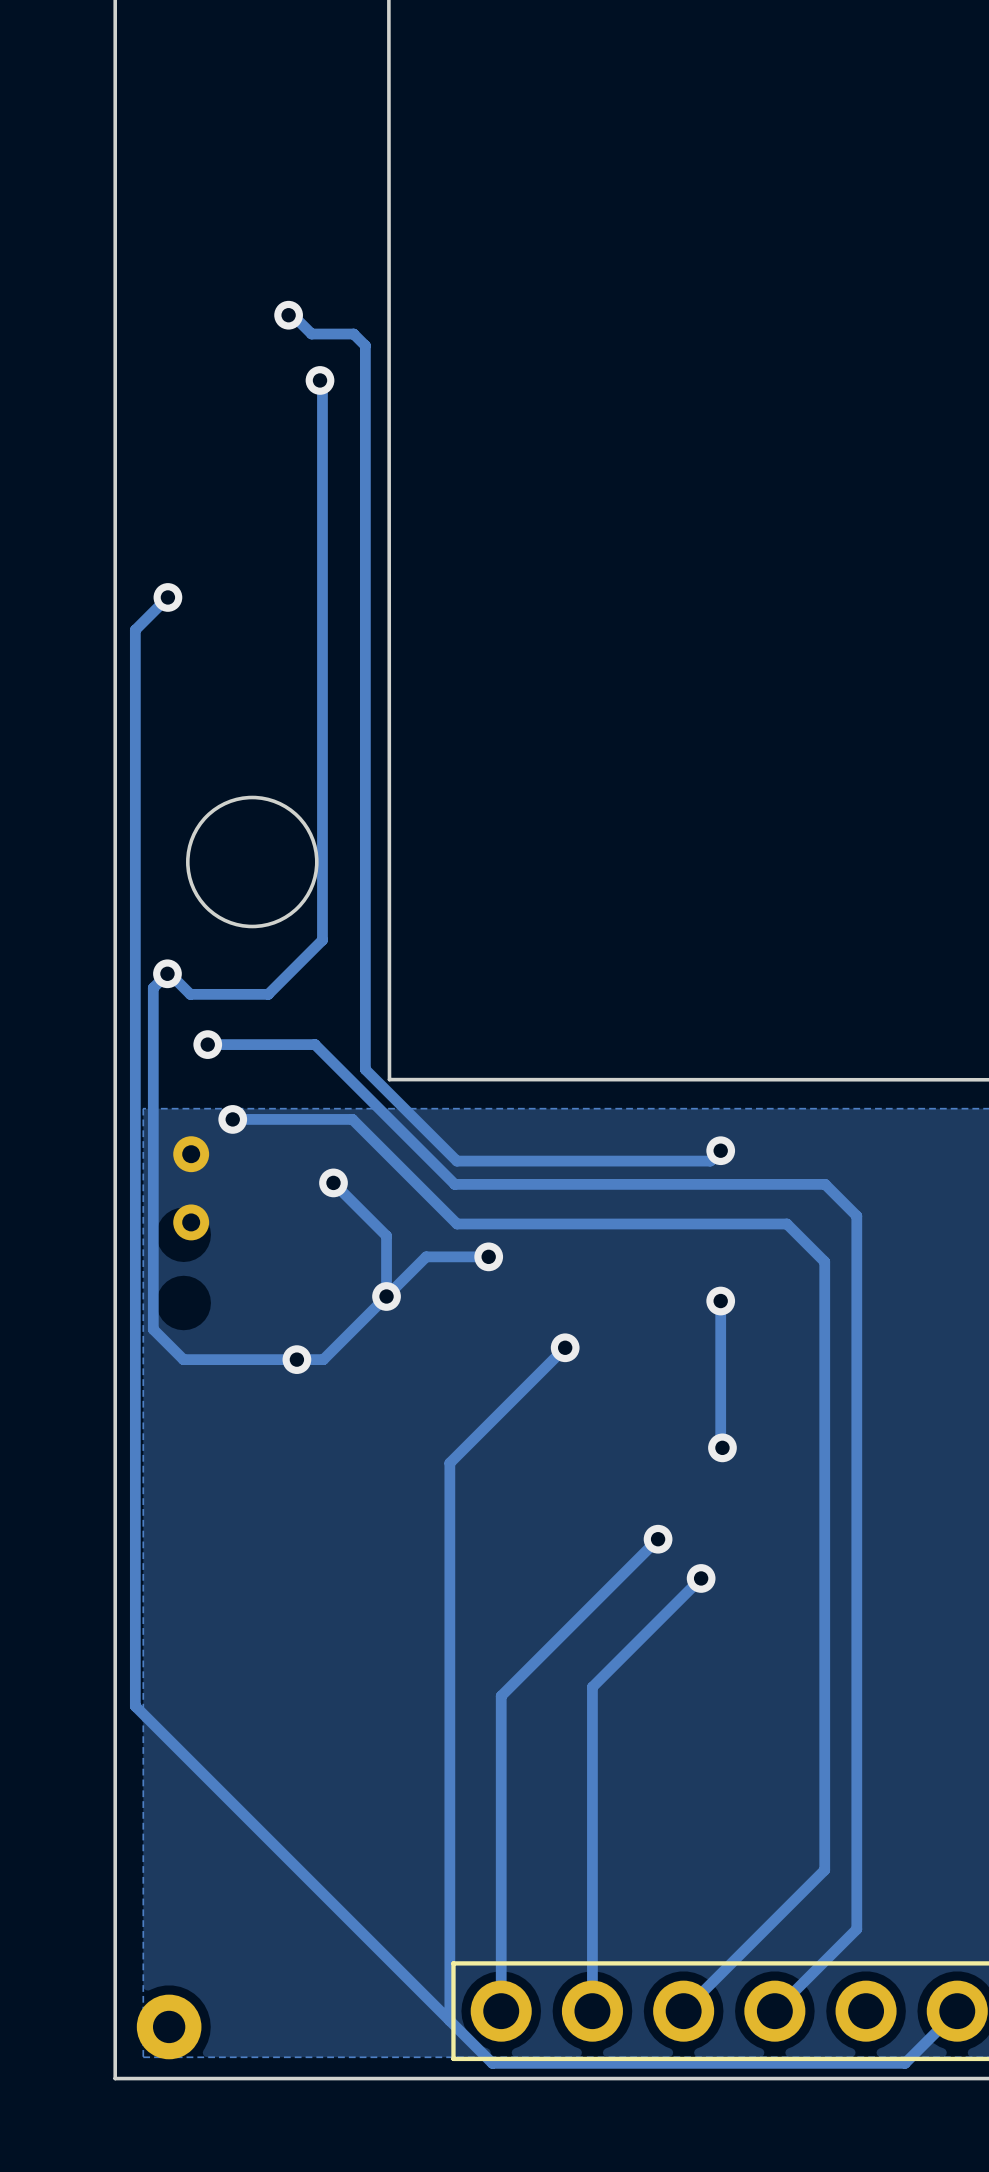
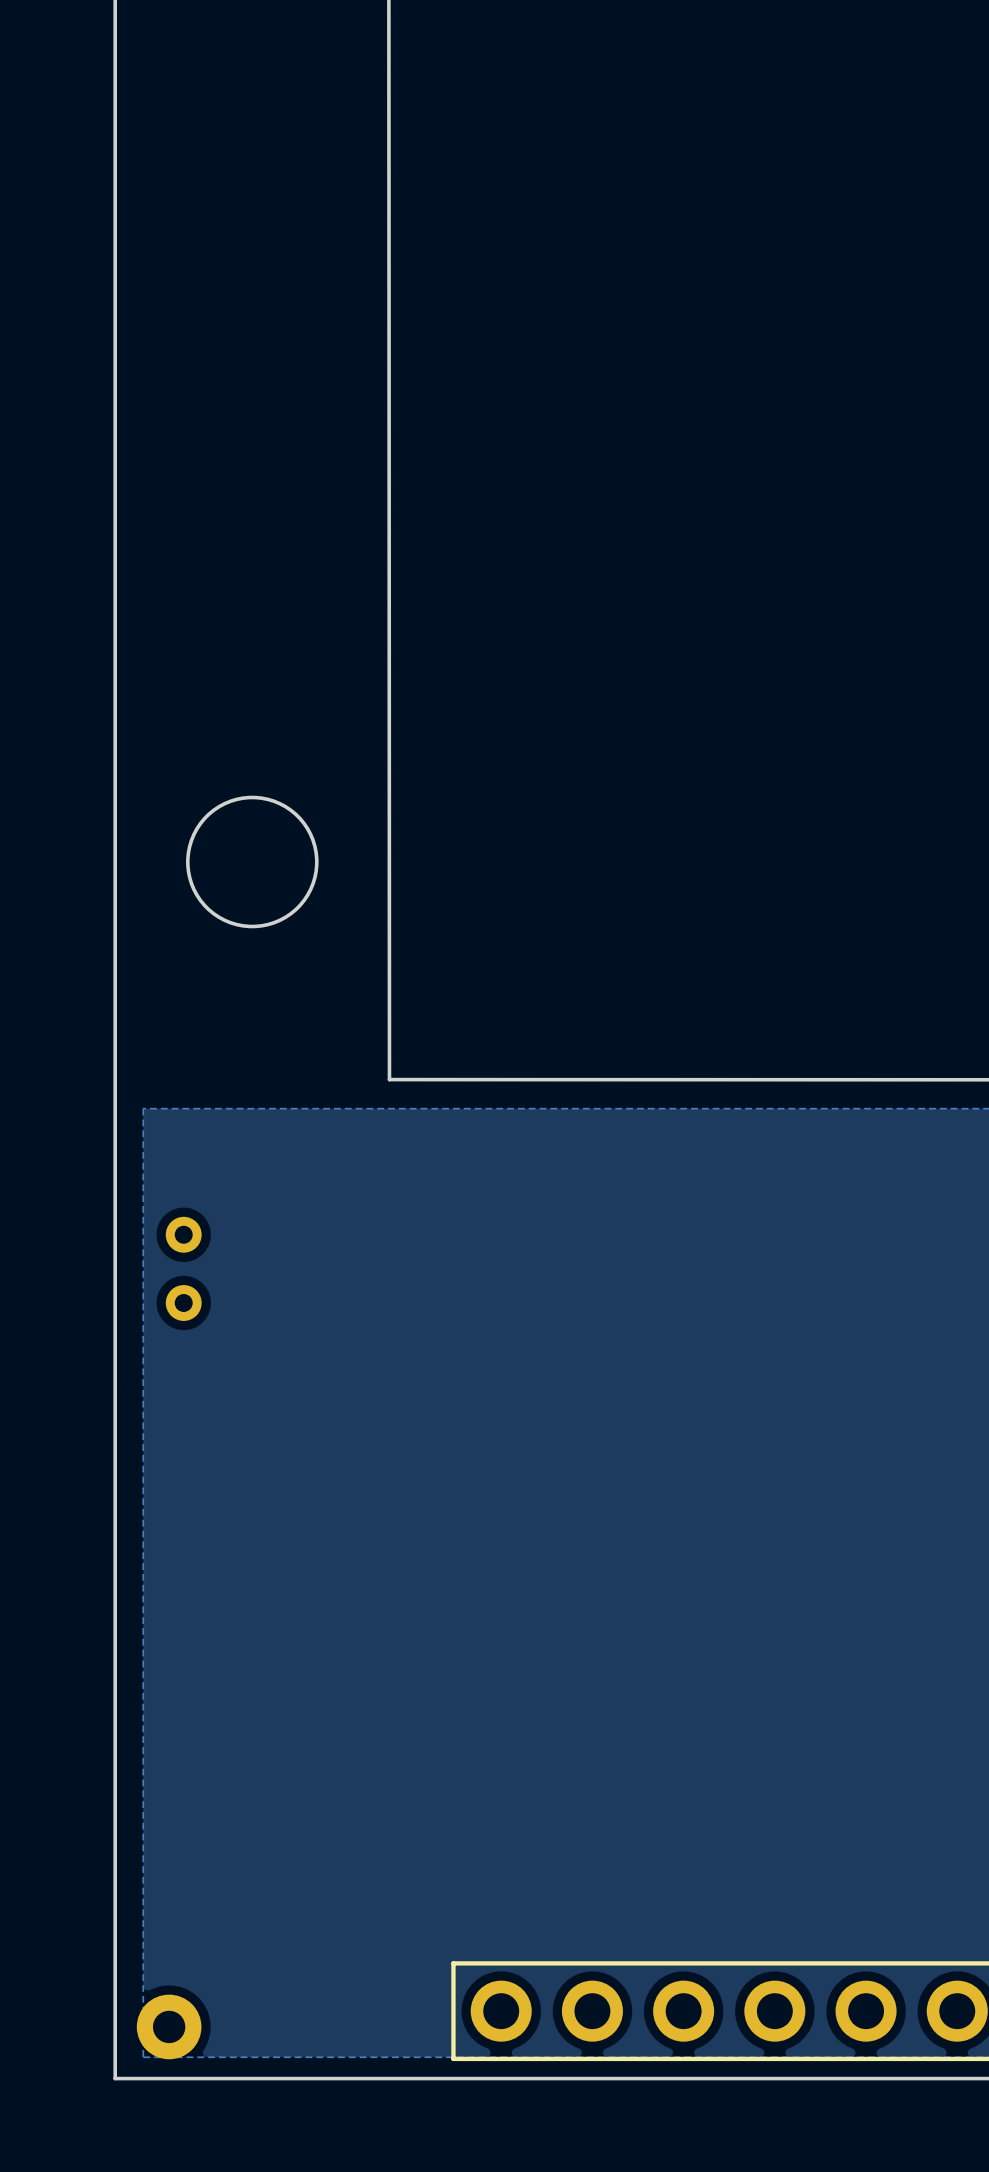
track: (288, 315) (292, 315) (311, 334) (353, 334) (365, 345) (365, 1069) (456, 1161) (710, 1161) (720, 1150) -> none
via: (288, 315) -> none
track: (320, 380) (322, 382) (322, 940) (268, 994) (190, 994) (169, 973) (167, 973) (153, 987) (153, 1329) (183, 1359) (323, 1359) (426, 1256) (488, 1256) -> none
via: (320, 380) -> none
track: (167, 597) (135, 630) (135, 1706) (492, 2063) (905, 2063) (957, 2011) -> none
via: (167, 597) -> none
via: (167, 973) -> none
track: (207, 1044) (315, 1044) (454, 1184) (825, 1184) (856, 1216) (856, 1929) (774, 2011) -> none
via: (207, 1044) -> none
track: (232, 1119) (352, 1119) (457, 1224) (786, 1224) (824, 1261) (824, 1870) (683, 2011) -> none
via: (232, 1119) -> none
via: (720, 1150) -> none
track: (333, 1182) (386, 1235) (386, 1296) -> none
via: (333, 1182) -> none
part position: (191, 1188) -> (183, 1268)
via: (488, 1256) -> none
via: (386, 1296) -> none
track: (720, 1301) (720, 1446) (722, 1447) -> none
via: (720, 1301) -> none
track: (565, 1347) (449, 1463) (449, 2020) -> none
via: (565, 1347) -> none
via: (296, 1359) -> none
via: (722, 1447) -> none
track: (658, 1539) (501, 1696) (501, 2011) -> none
via: (658, 1539) -> none
track: (701, 1578) (592, 1687) (592, 2011) -> none
via: (701, 1578) -> none

